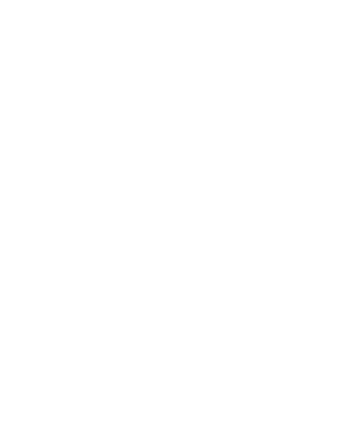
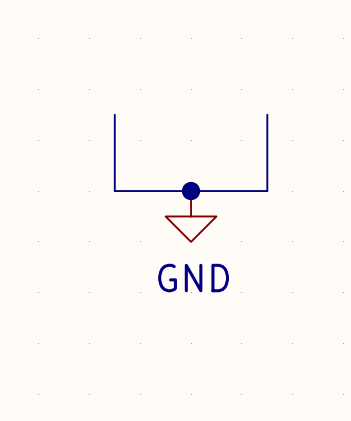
wire: none -> (114, 114) (114, 191) (267, 191) (267, 114)
junction: none -> (191, 191)
power symbol: none -> GND (191, 216)

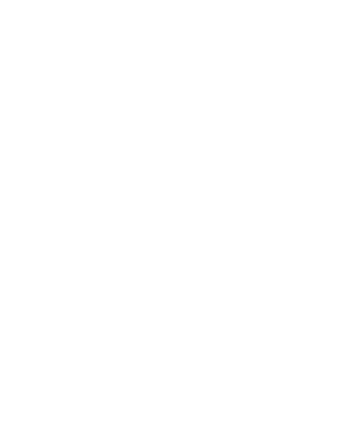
wire: (114, 114) (114, 191) (267, 191) (267, 114) -> none
junction: (191, 191) -> none
power symbol: GND (191, 216) -> none

